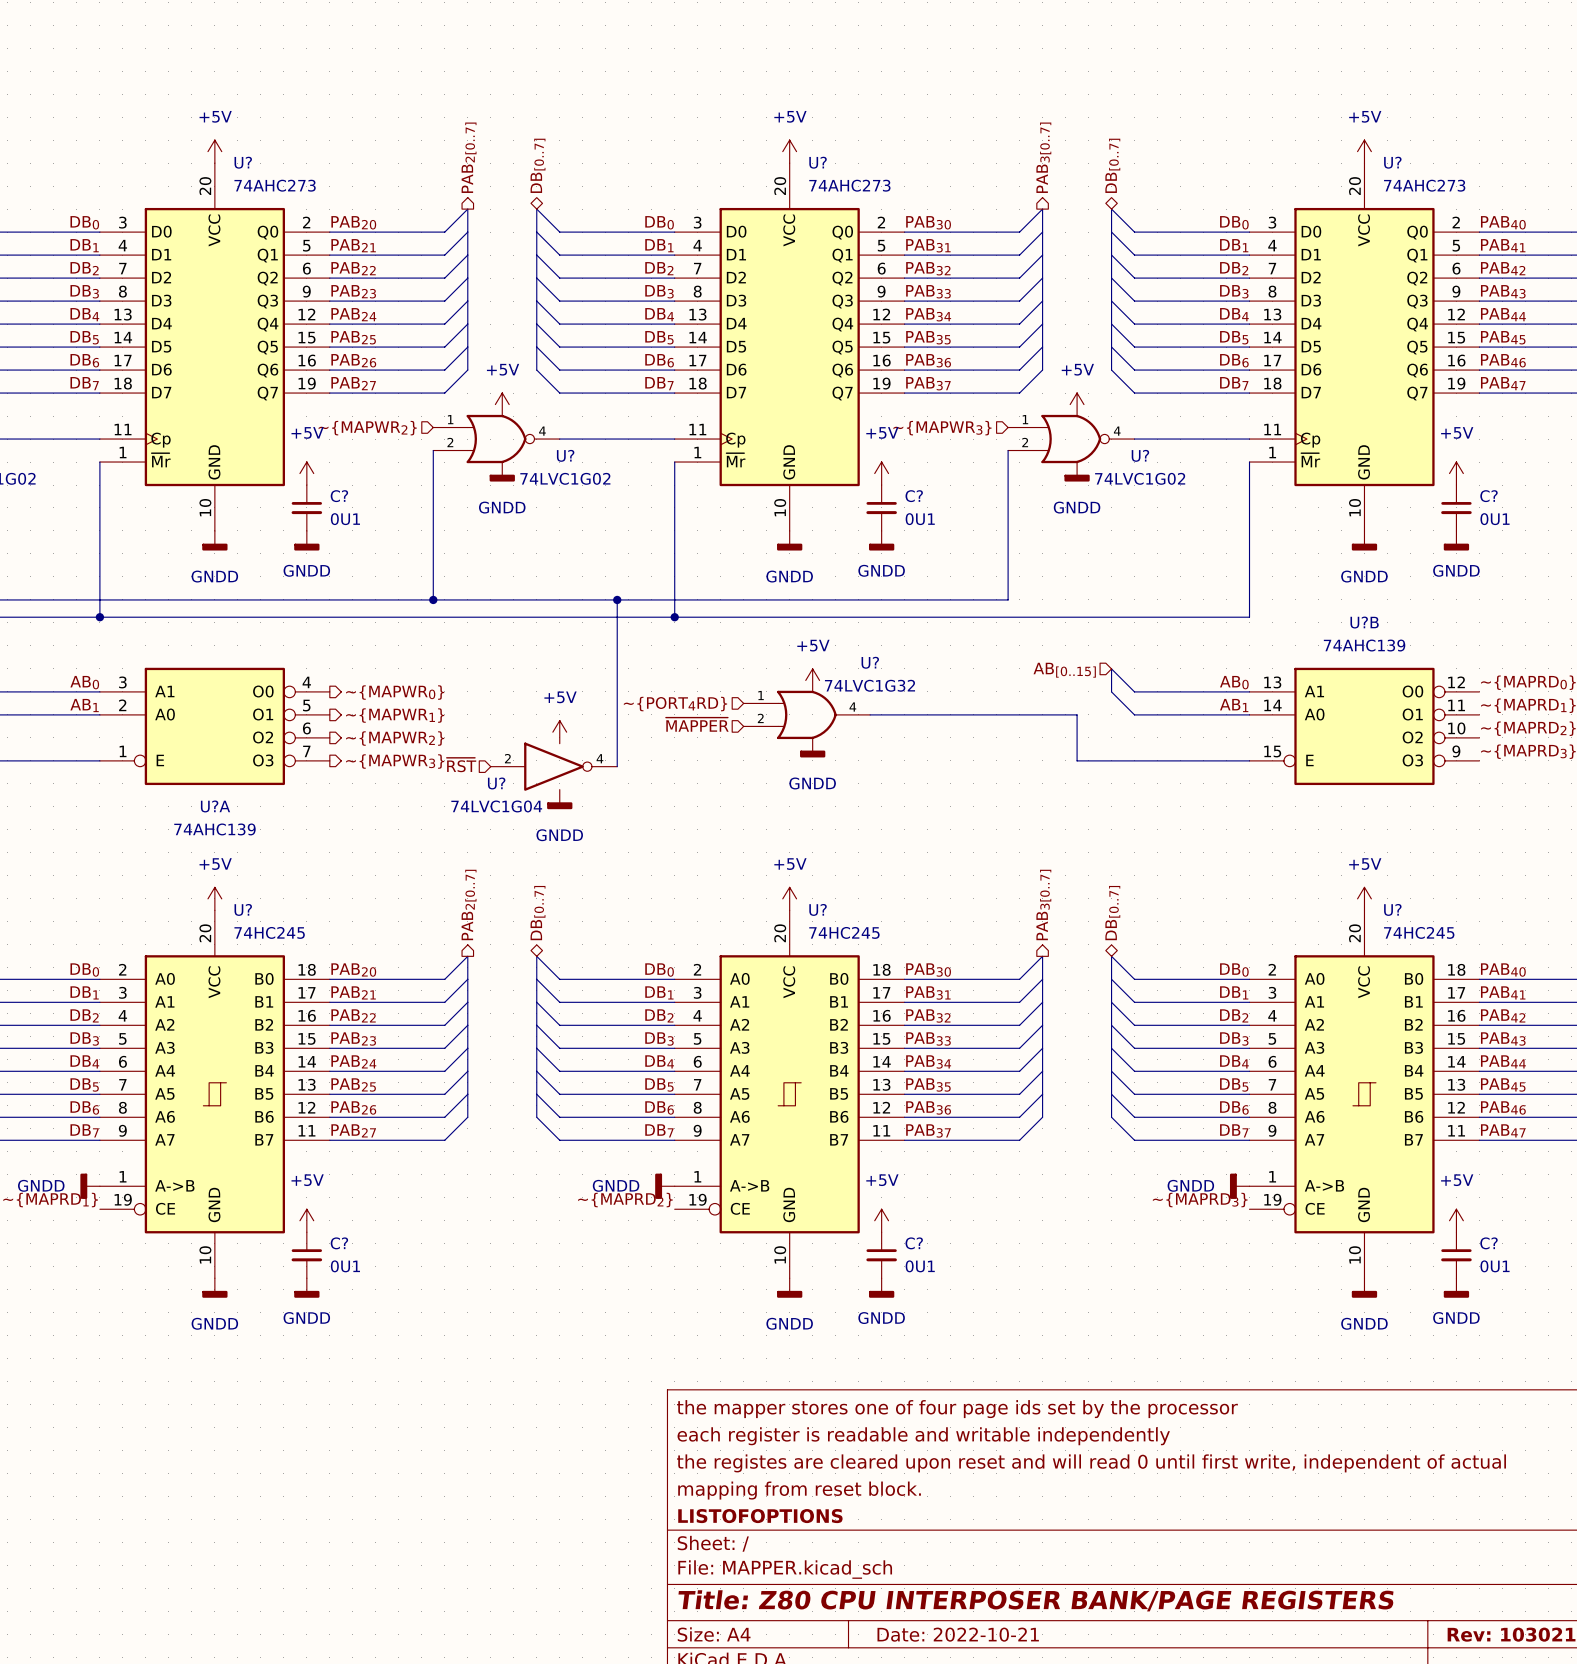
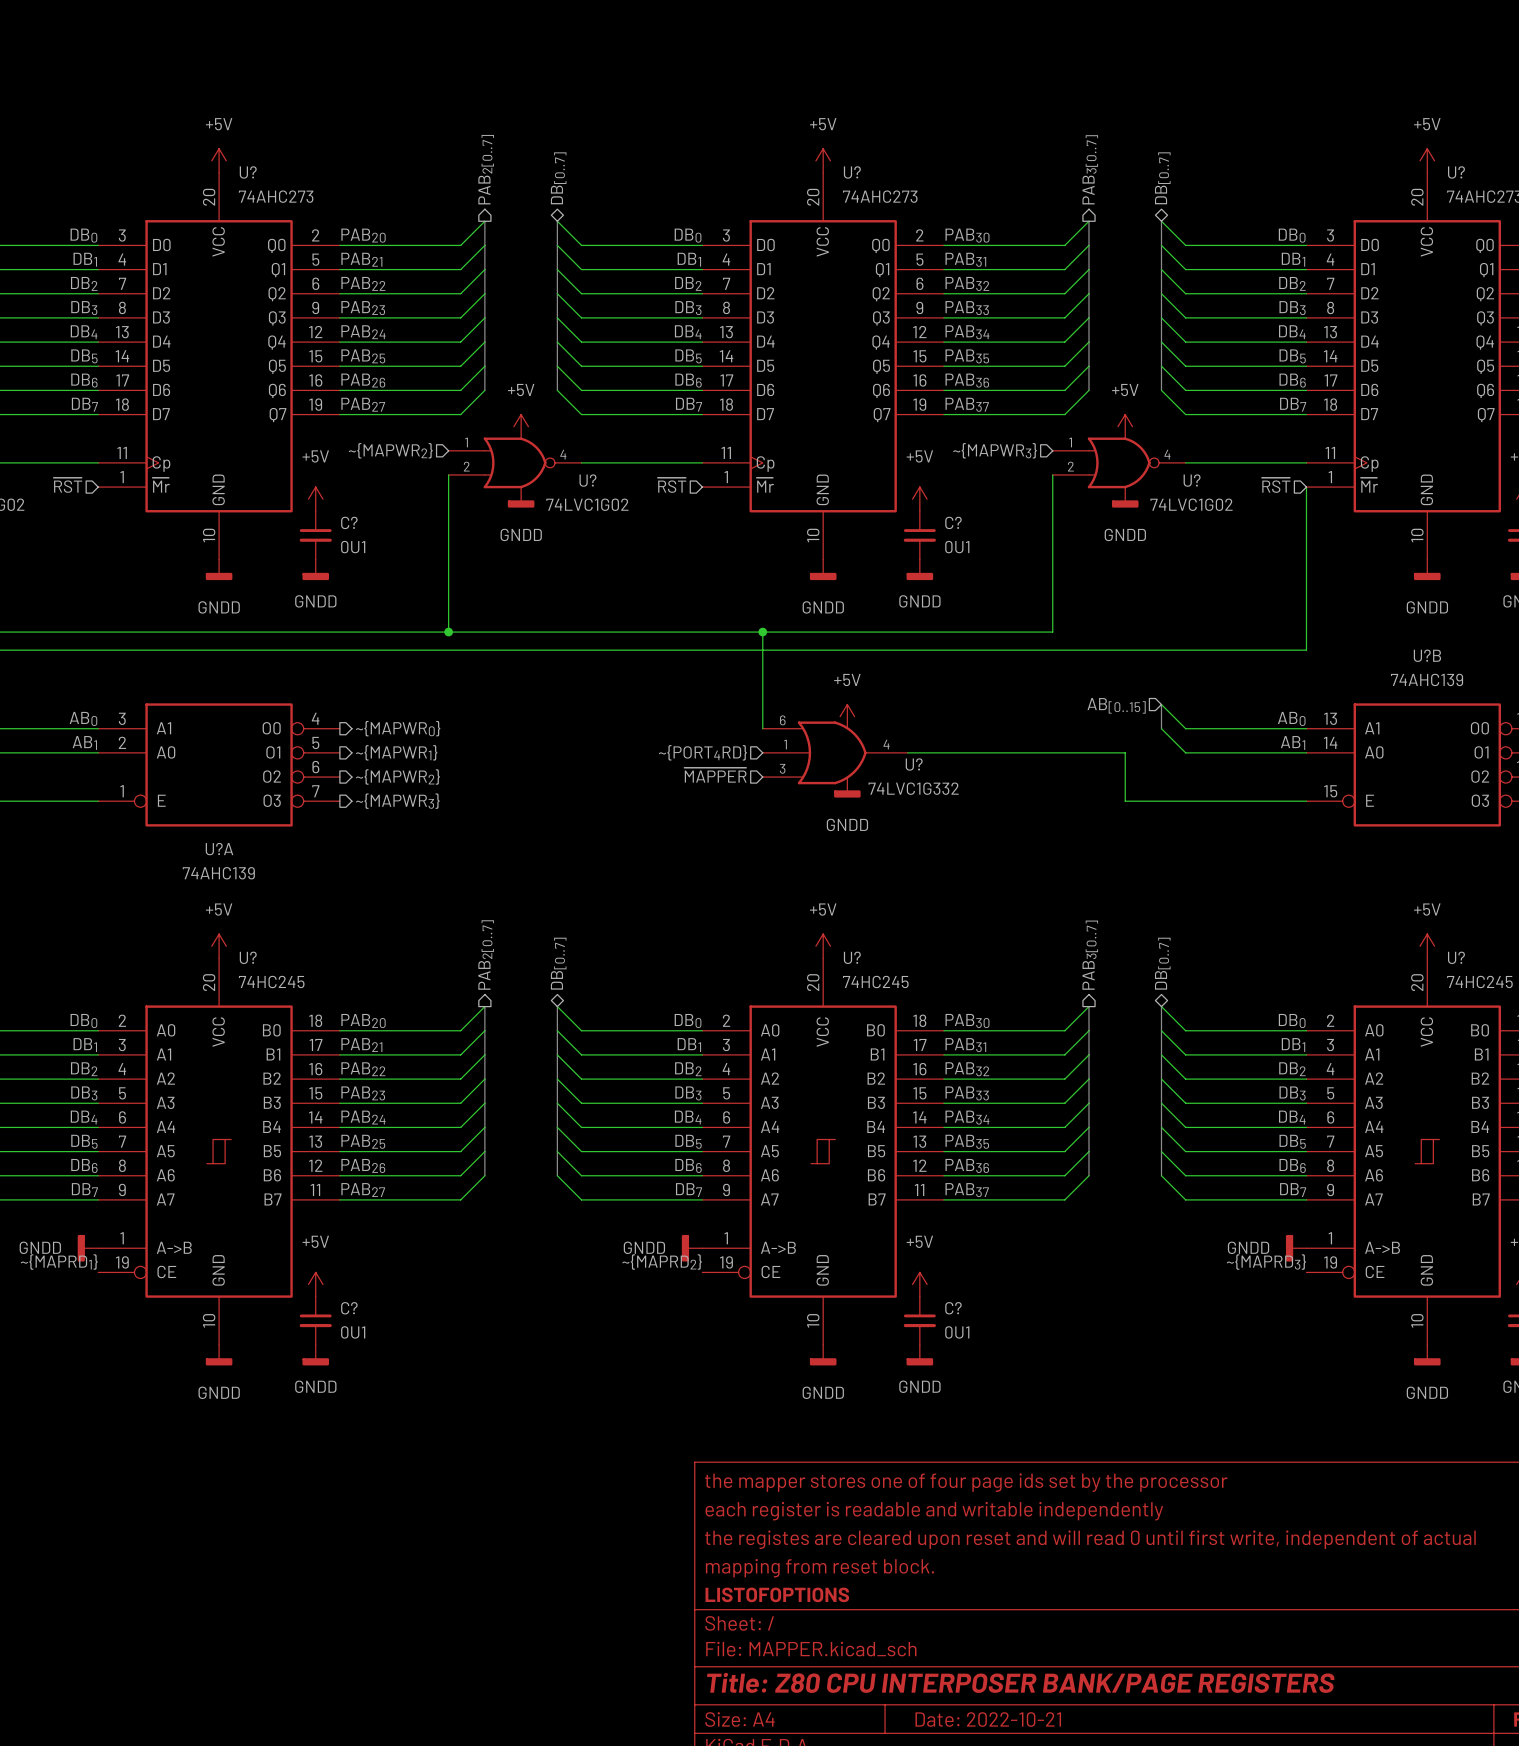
hierarchical label: none -> ~{RST} (67, 485)
hierarchical label: none -> ~{RST} (672, 485)
hierarchical label: none -> ~{RST} (1276, 485)
wire: (99, 462) (99, 617) -> none
wire: (674, 462) (674, 617) -> none
wire: (617, 599) (617, 766) -> none
junction: (617, 599) -> none
wire: none -> (762, 632) (762, 728)
junction: none -> (762, 632)
junction: (99, 617) -> none
junction: (674, 617) -> none
U? name position: U? (870, 662) -> U? (914, 764)
U? value: 74LVC1G32 (870, 685) -> 74LVC1G332 (913, 788)
U? symbol: [743, 690, 871, 740] -> [762, 721, 908, 785]
hierarchical label position: ~{PORT4RD} (675, 704) -> ~{PORT4RD} (702, 752)
hierarchical label position: ~{MAPPER} (697, 724) -> ~{MAPPER} (715, 775)
power symbol: +5V (559, 732) -> none
hierarchical label: ~{RST} (461, 765) -> none
U?: 74LVC1G04 (554, 766) -> none
power symbol: GNDD (559, 799) -> none

